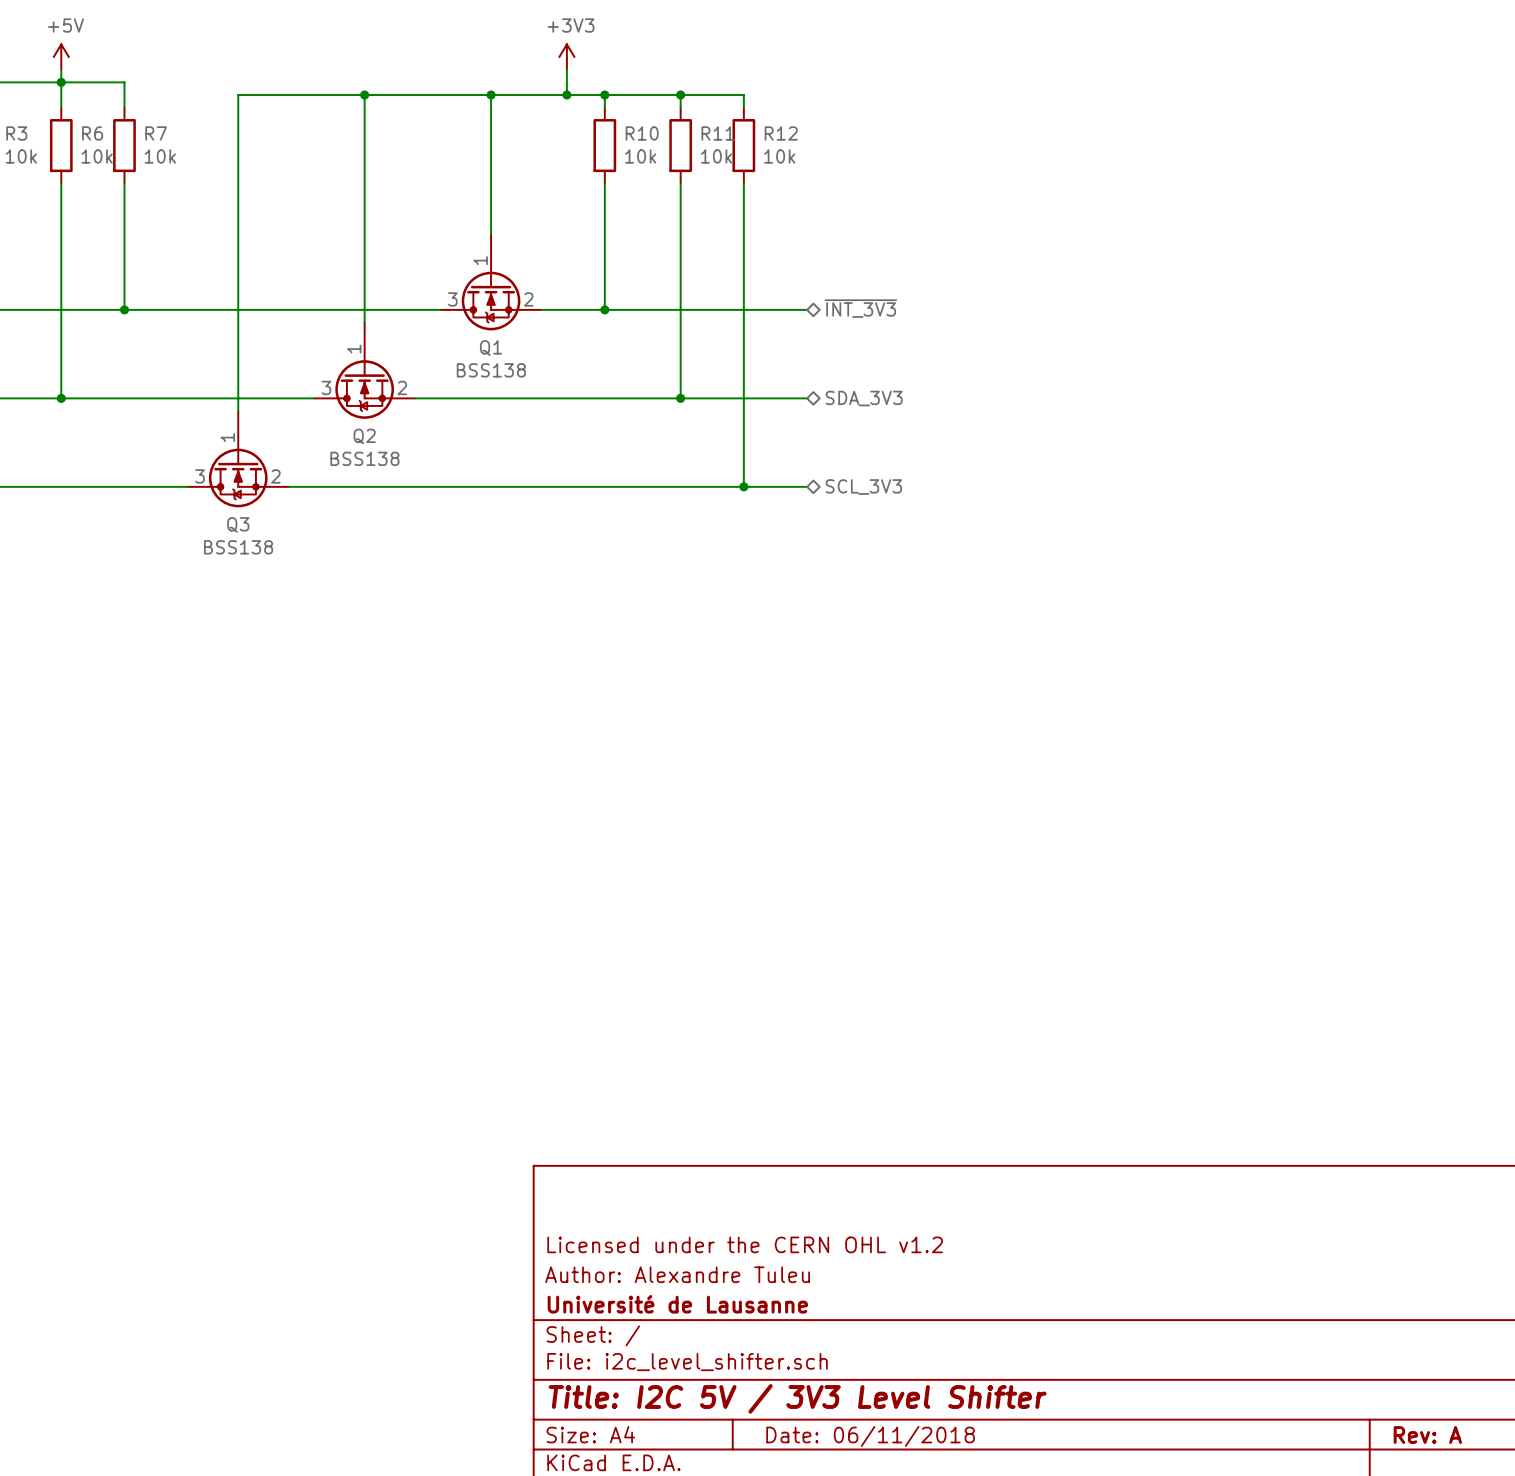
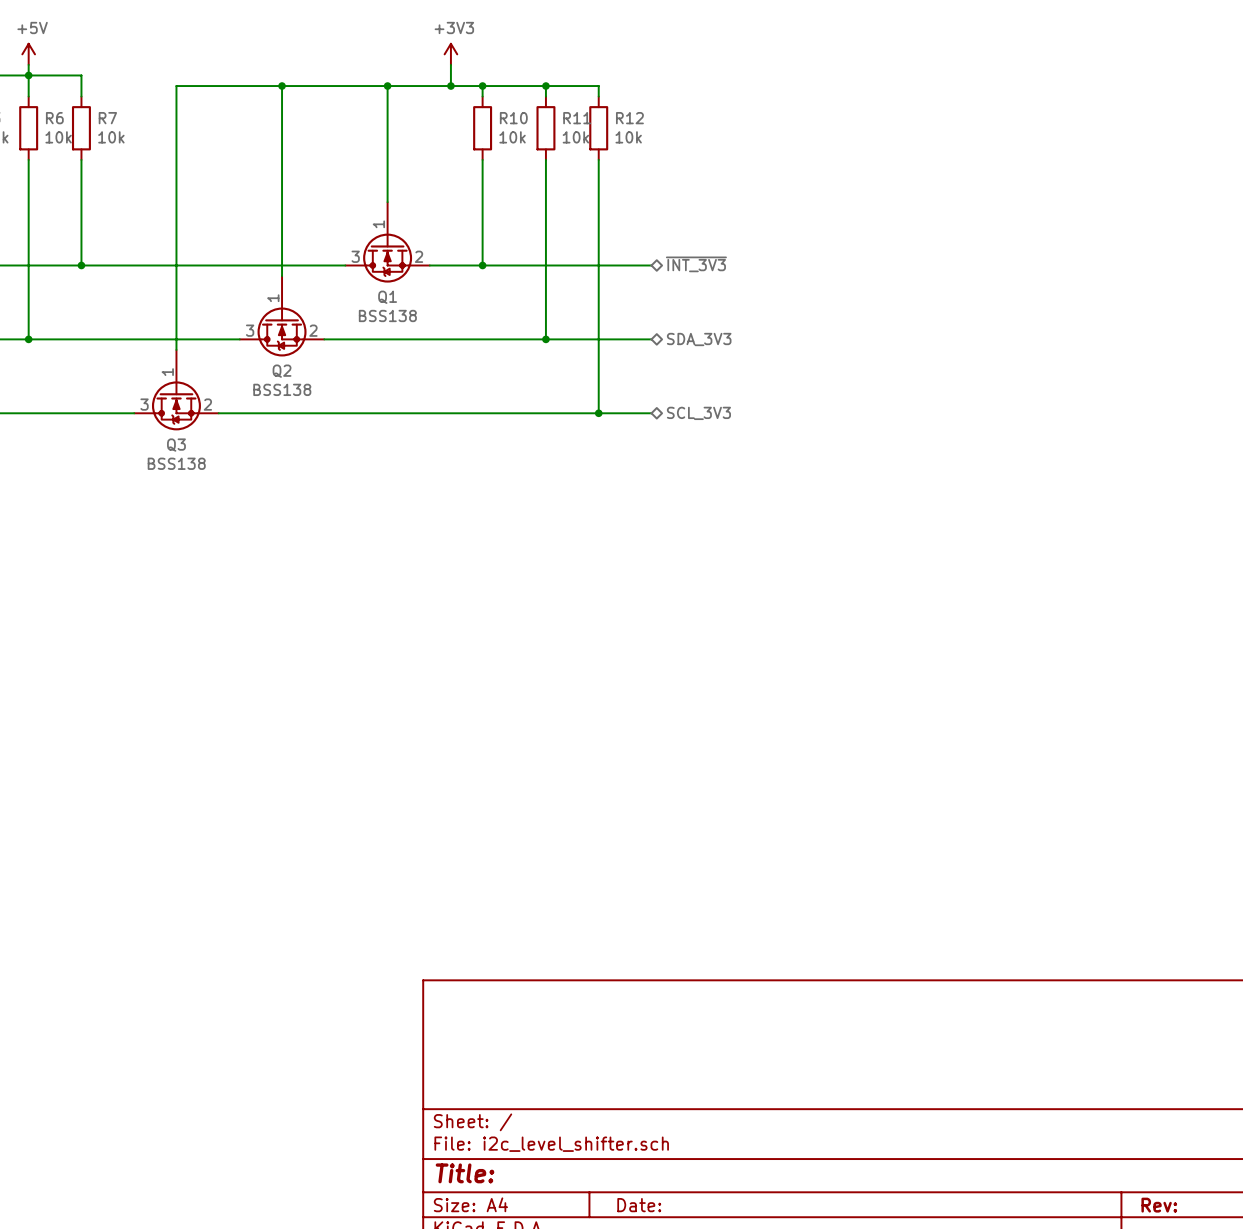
title block: Licensed under the CERN OHL v1.2 (745, 1244) -> none
title block: Author: Alexandre Tuleu (677, 1274) -> none
title block: Université de Lausanne (677, 1304) -> none
title block: Title: I2C 5V / 3V3 Level Shifter (797, 1398) -> Title: (465, 1173)
title block: Rev: A (1427, 1435) -> Rev: (1159, 1205)
title block: Date: 06/11/2018 (870, 1436) -> Date: (639, 1205)

